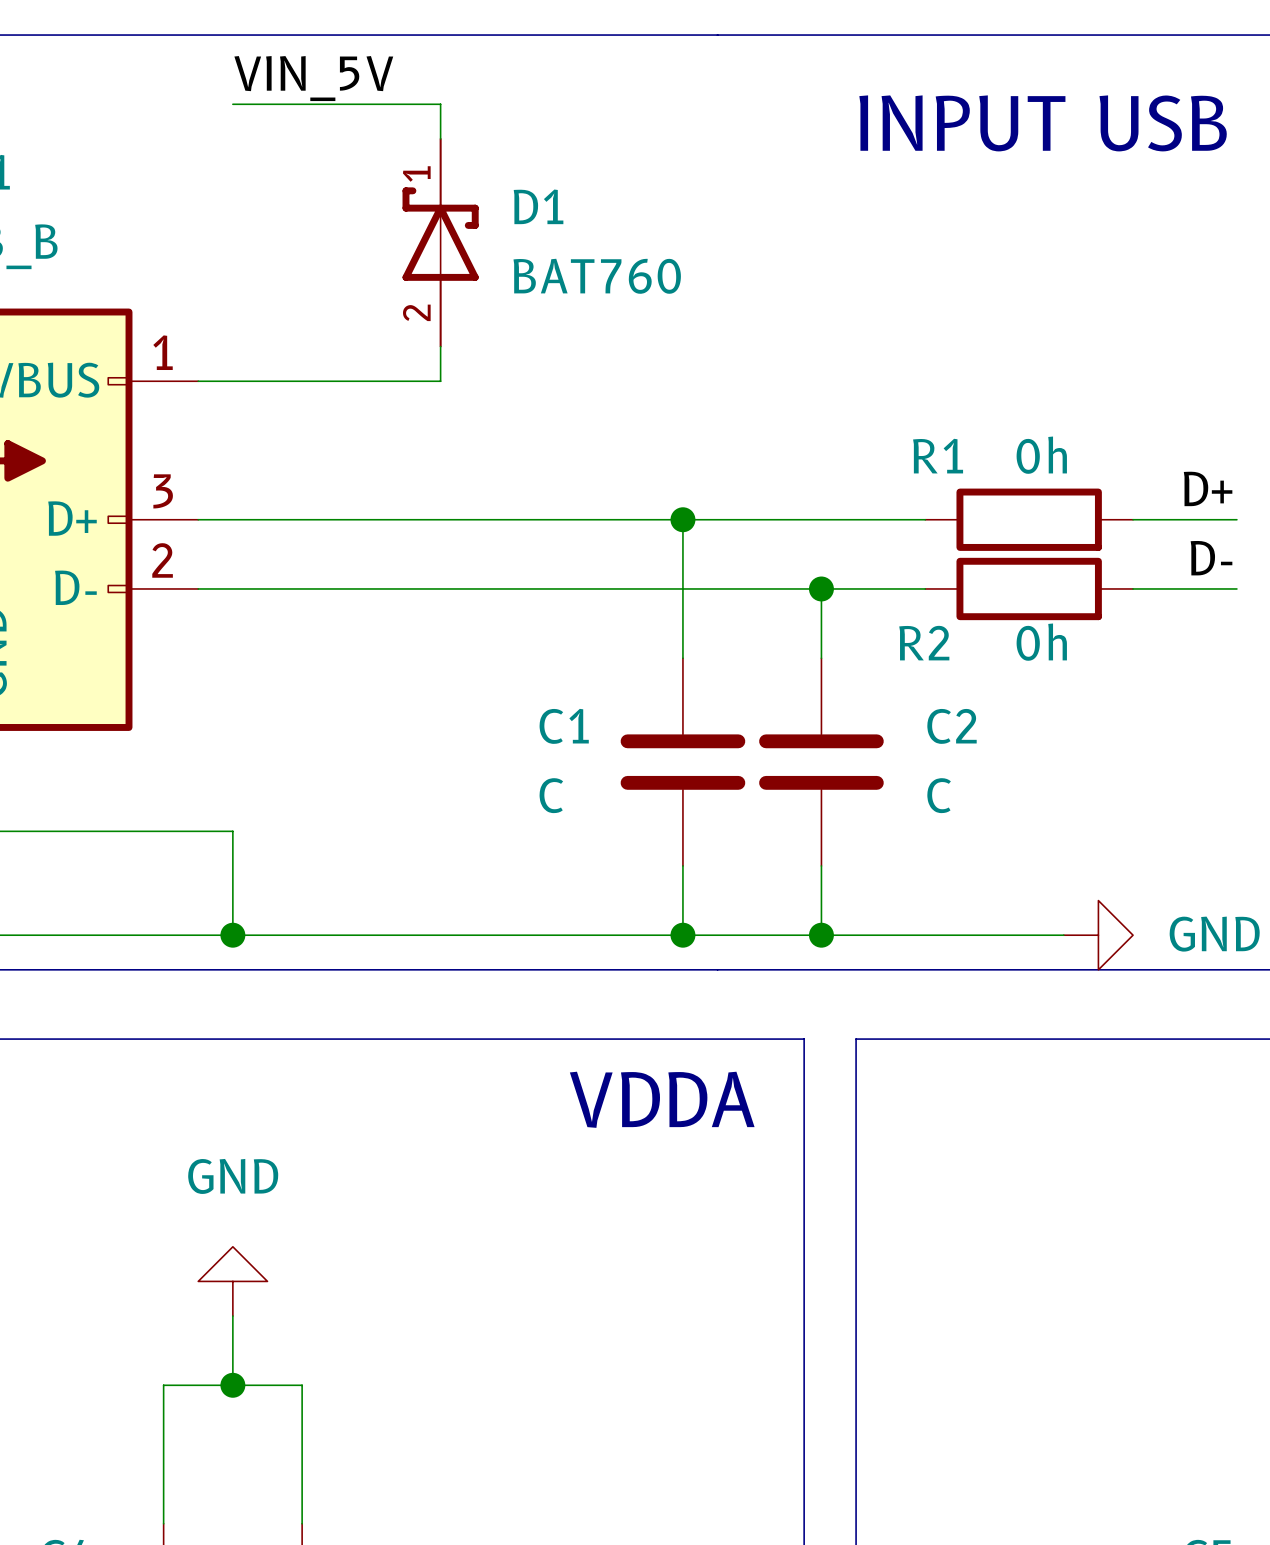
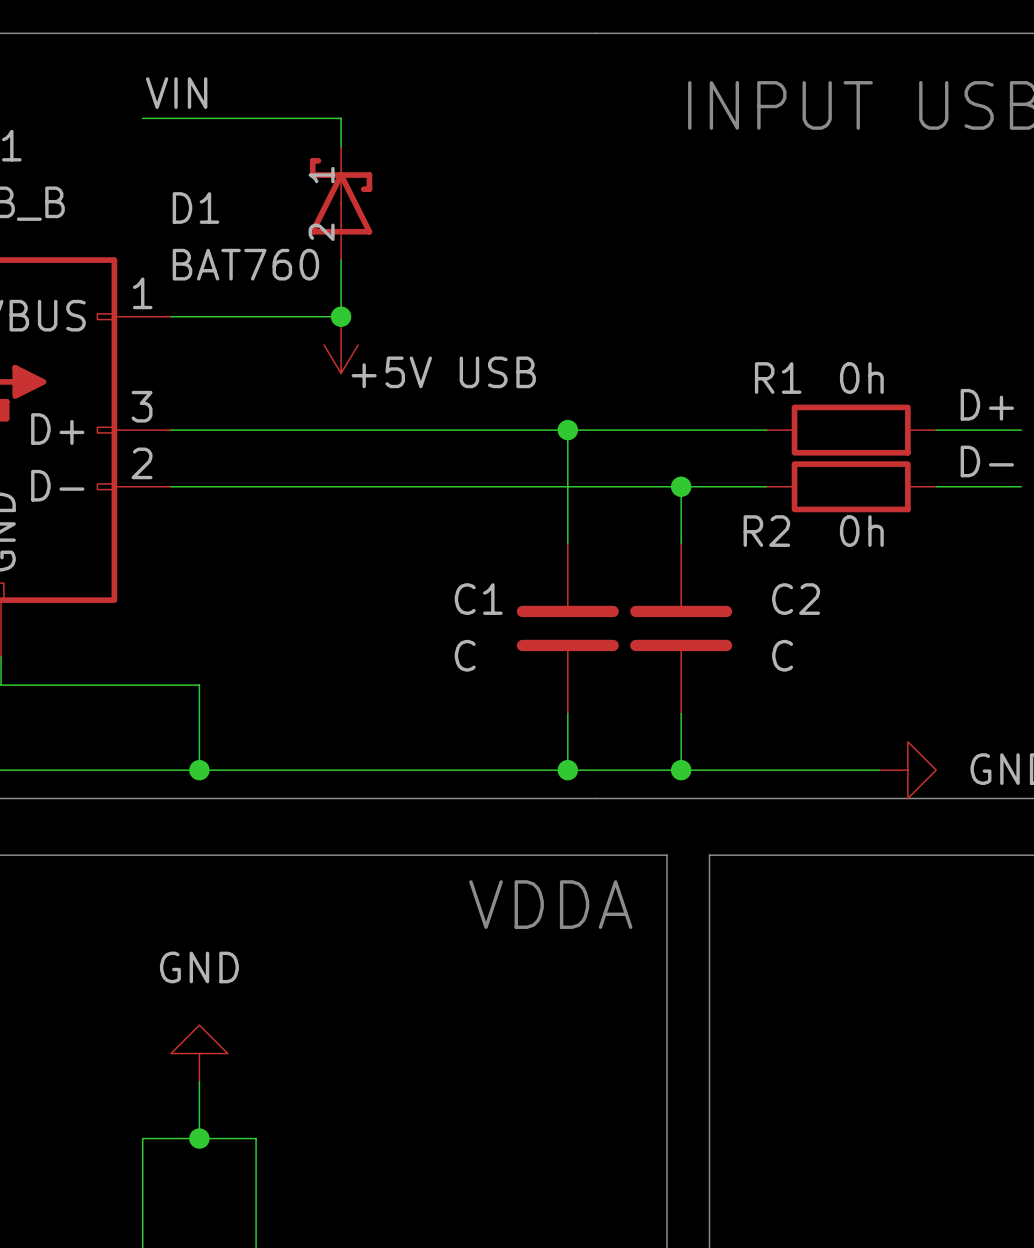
label: VIN_5V (313, 78) -> VIN (176, 93)
wire: (232, 104) (440, 104) (440, 138) -> none
wire: none -> (142, 118) (341, 118) (341, 146)
D1 symbol: [402, 138, 479, 347] -> [309, 146, 373, 261]
D1 name position: D1 (538, 206) -> D1 (195, 207)
D1 value position: BAT760 (597, 276) -> BAT760 (245, 264)
wire: (440, 346) (440, 381) (405, 381) -> (341, 260) (341, 316)
junction: none -> (341, 316)
power symbol: none -> +5V USB (341, 345)

